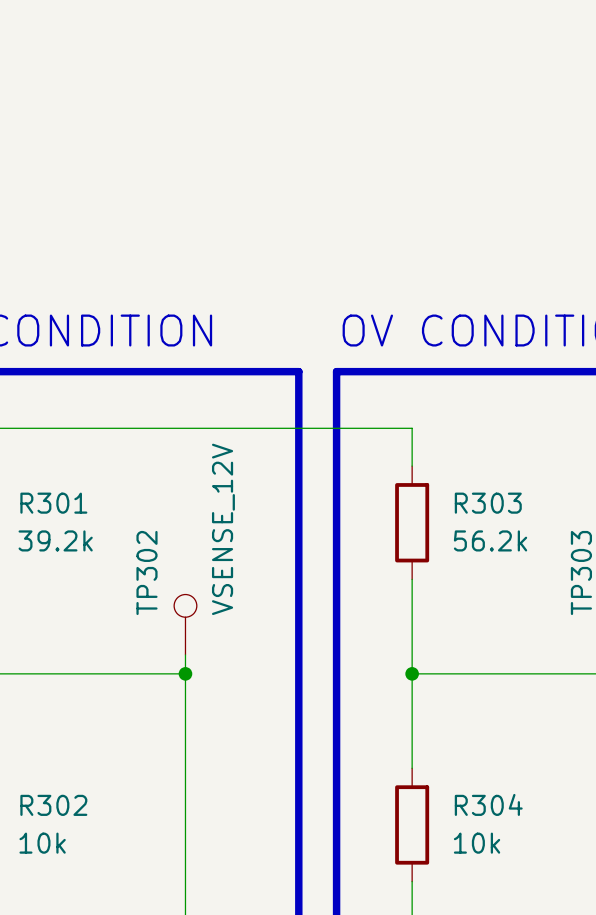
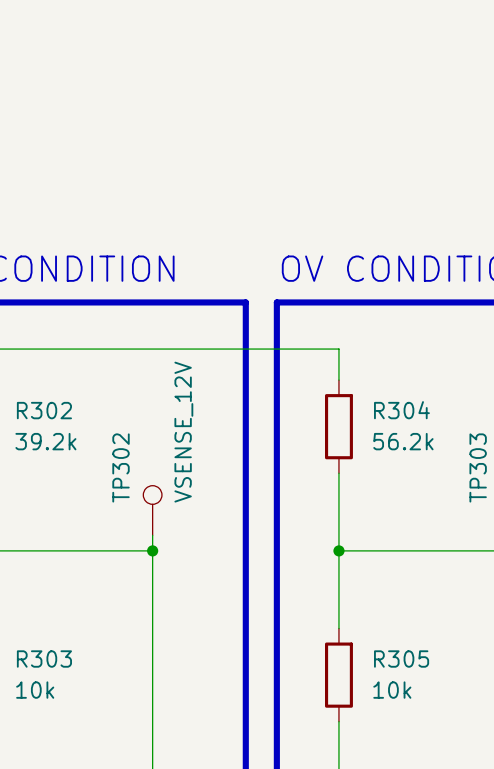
R301 name: R301 (53, 503) -> R302 (44, 410)
R303 name: R303 (488, 503) -> R304 (401, 410)
R304 name: R304 (488, 804) -> R305 (401, 659)
R302 name: R302 (53, 805) -> R303 (44, 659)

